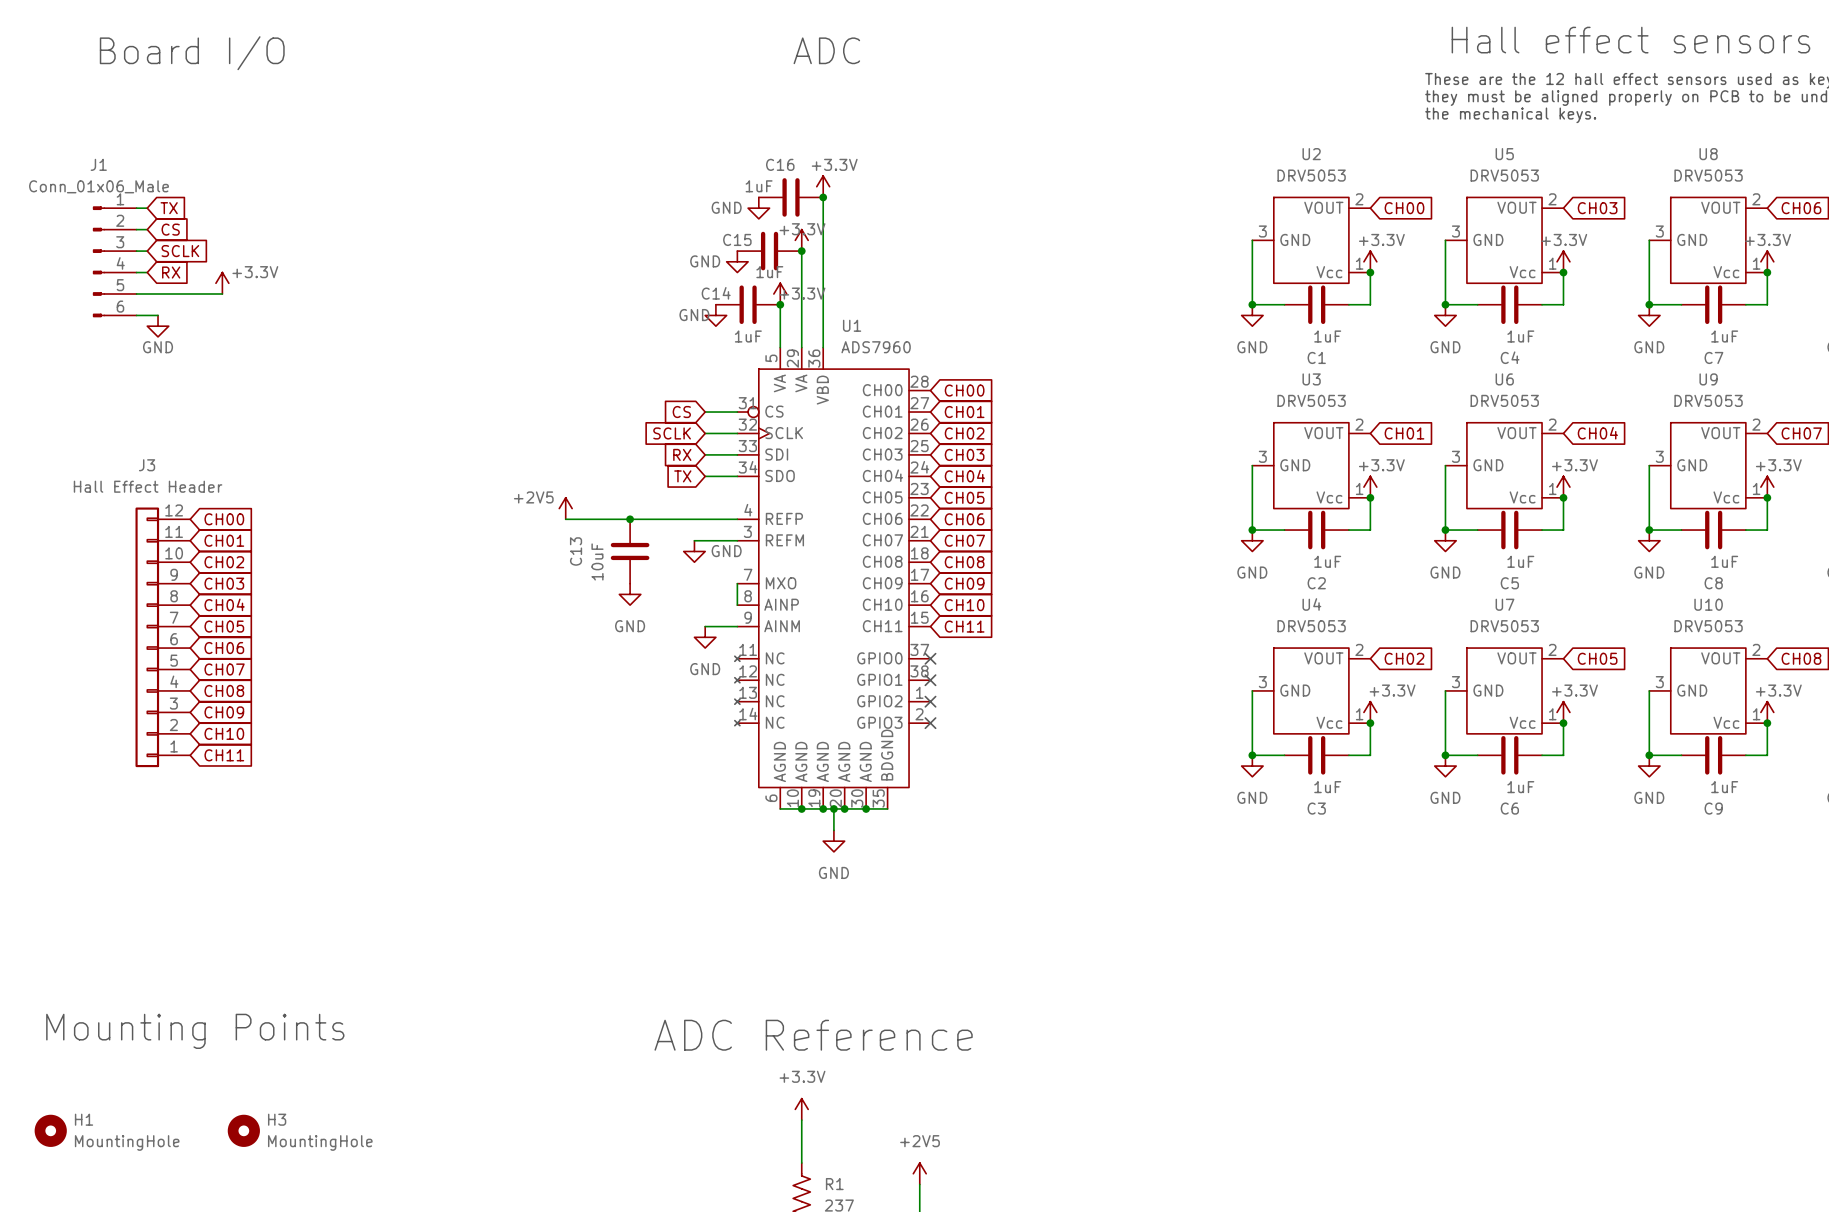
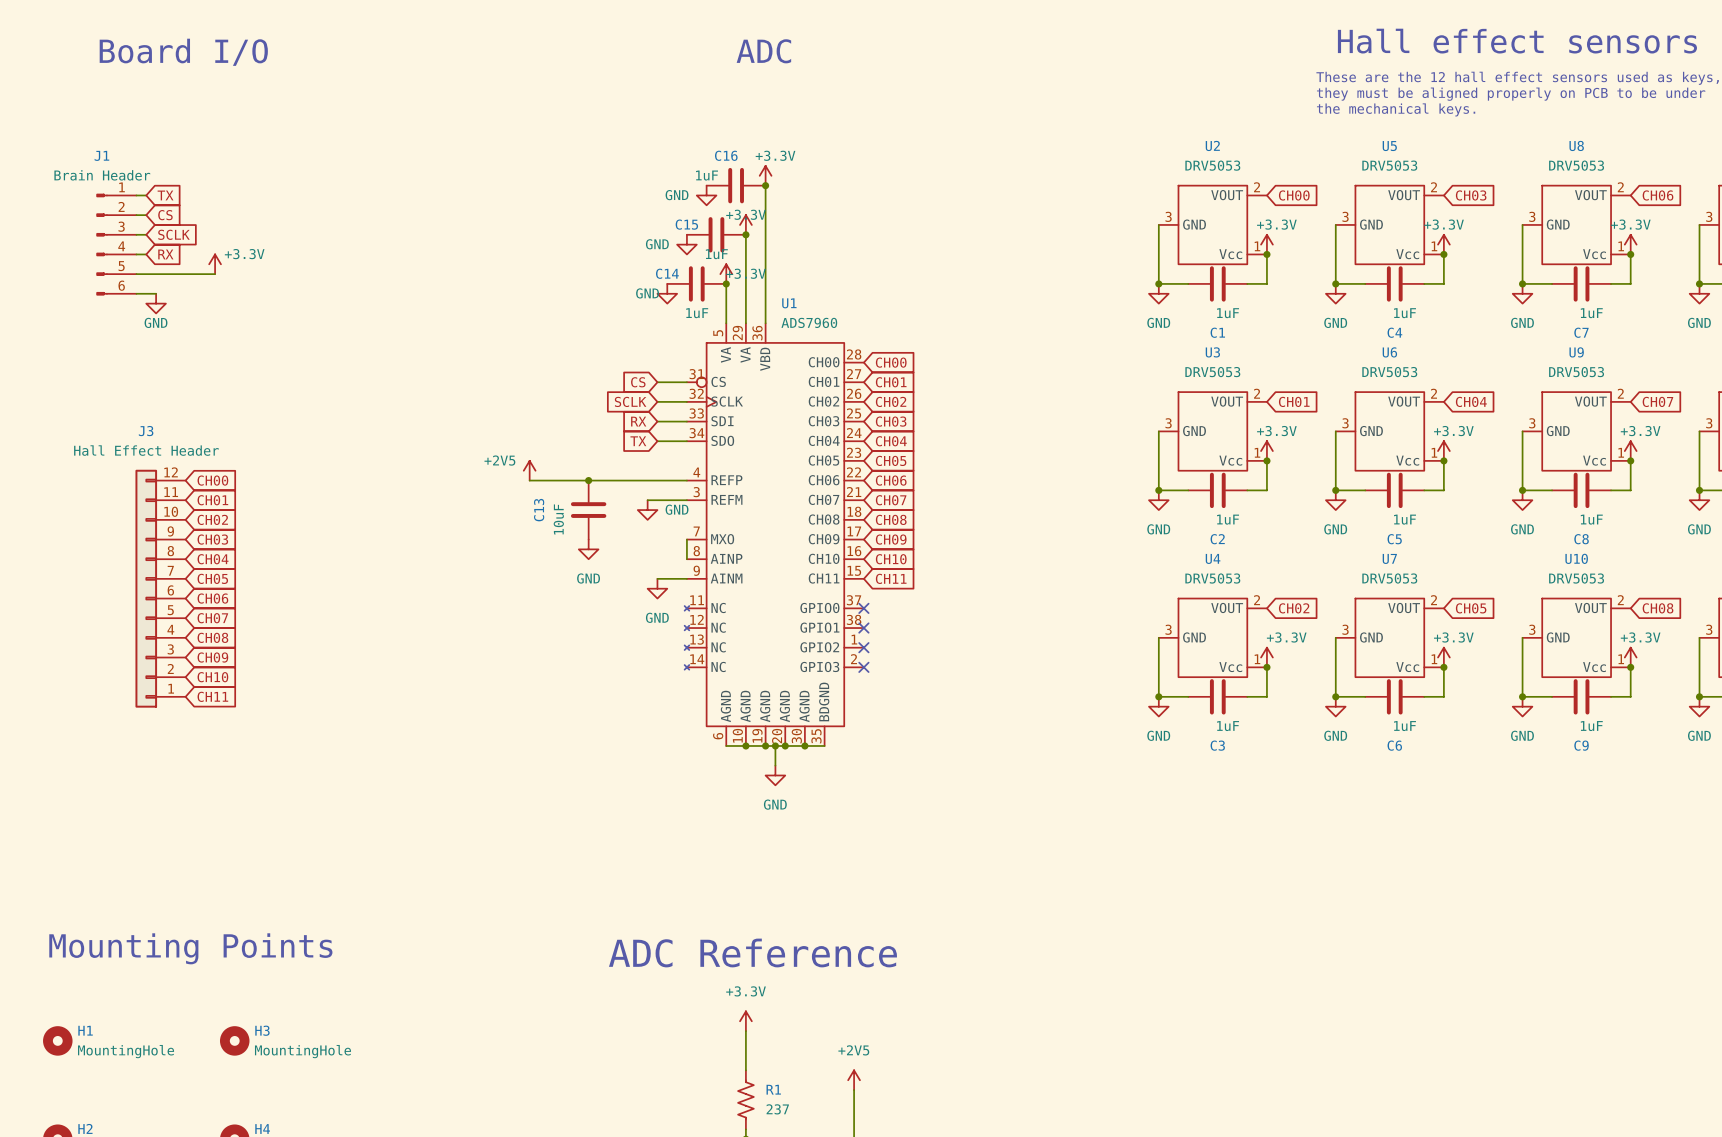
J1 value: Conn_01x06_Male (99, 186) -> Brain Header (102, 175)

